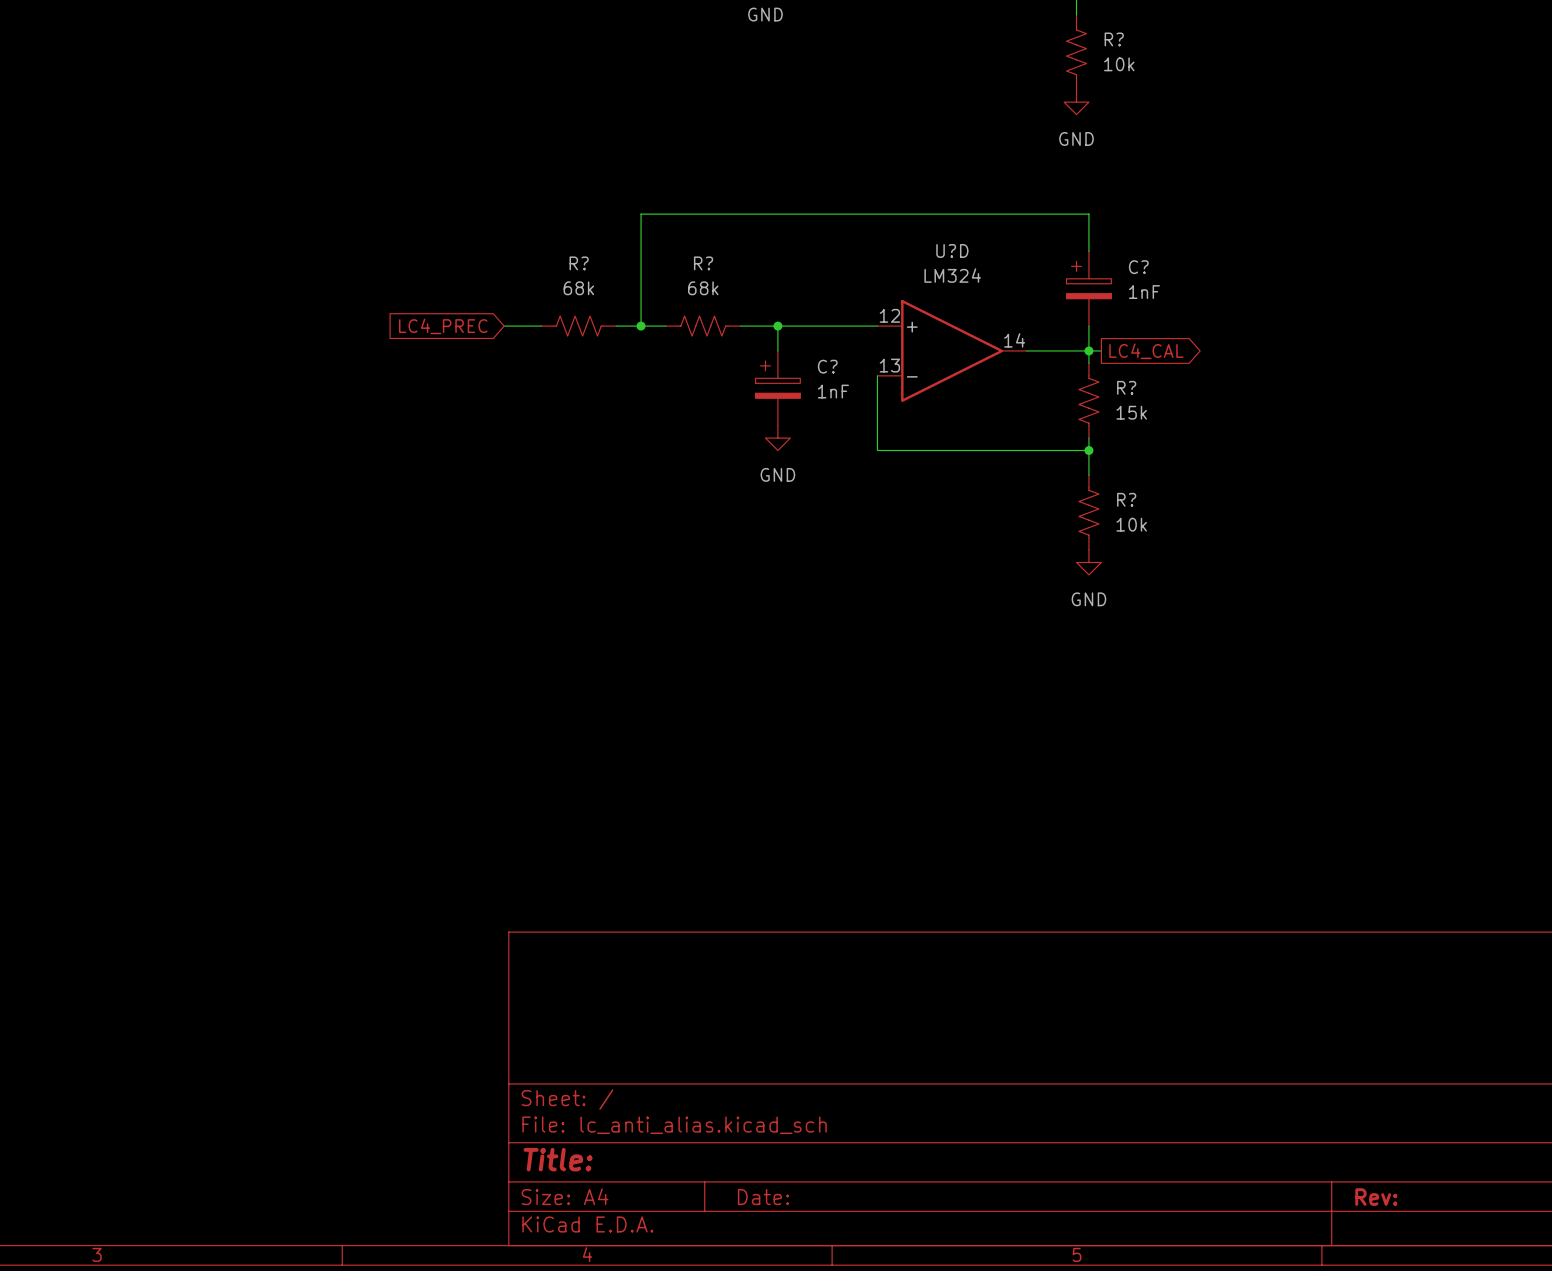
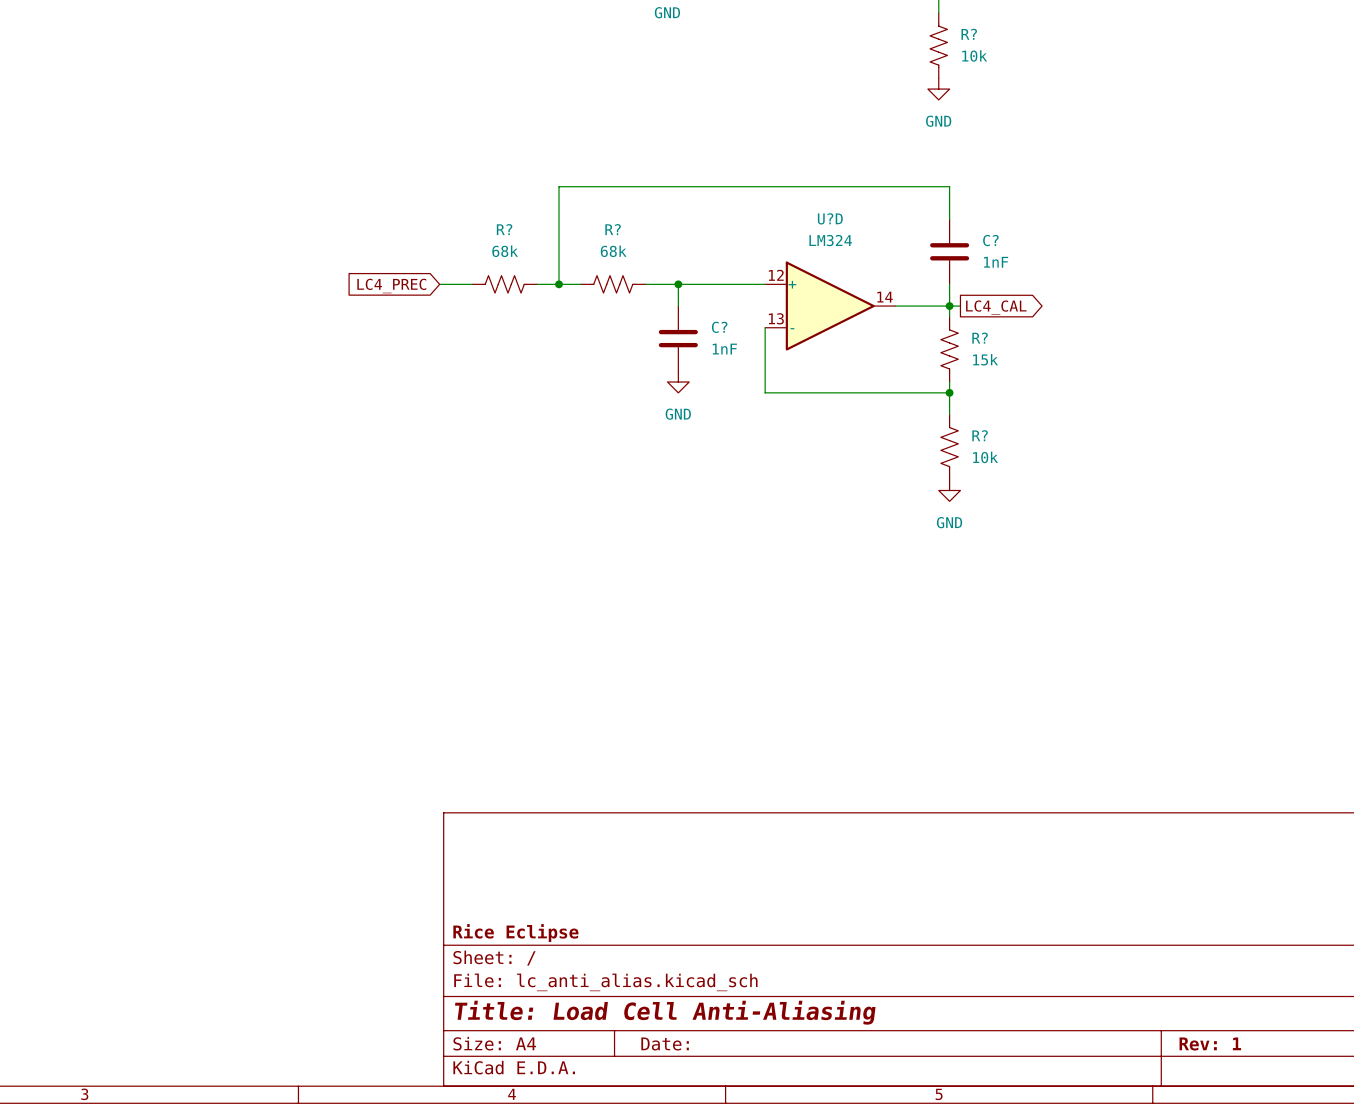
C? symbol: [1066, 251, 1112, 327] -> [930, 219, 970, 285]
C? symbol: [755, 350, 801, 426] -> [658, 306, 698, 372]
title block: none -> Rice Eclipse (515, 933)
title block: Title: (558, 1159) -> Title: Load Cell Anti-Aliasing (665, 1012)
title block: Rev: (1376, 1197) -> Rev: 1 (1210, 1043)

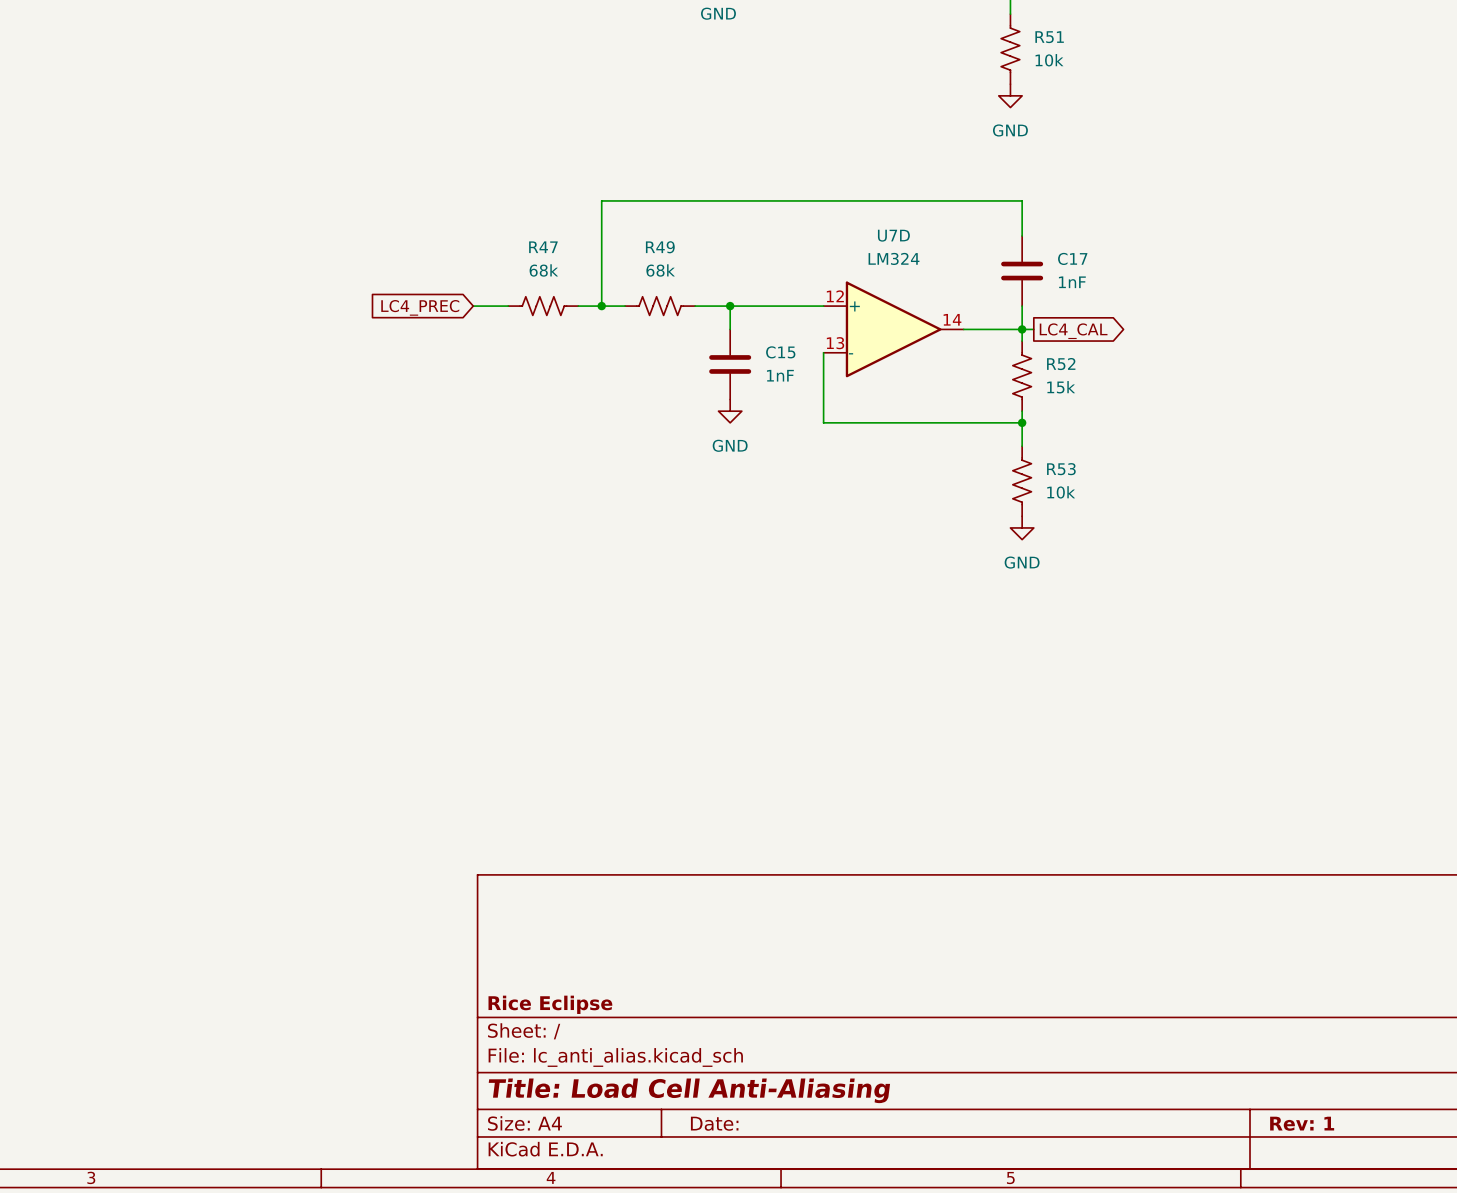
R? name: R? (969, 34) -> R51 (1049, 37)
U?D name: U?D (830, 218) -> U7D (893, 235)
R? name: R? (504, 229) -> R47 (543, 247)
R? name: R? (613, 229) -> R49 (660, 247)
C? name: C? (990, 240) -> C17 (1072, 258)
C? name: C? (719, 327) -> C15 (780, 352)
R? name: R? (980, 338) -> R52 (1061, 364)
R? name: R? (980, 435) -> R53 (1061, 469)

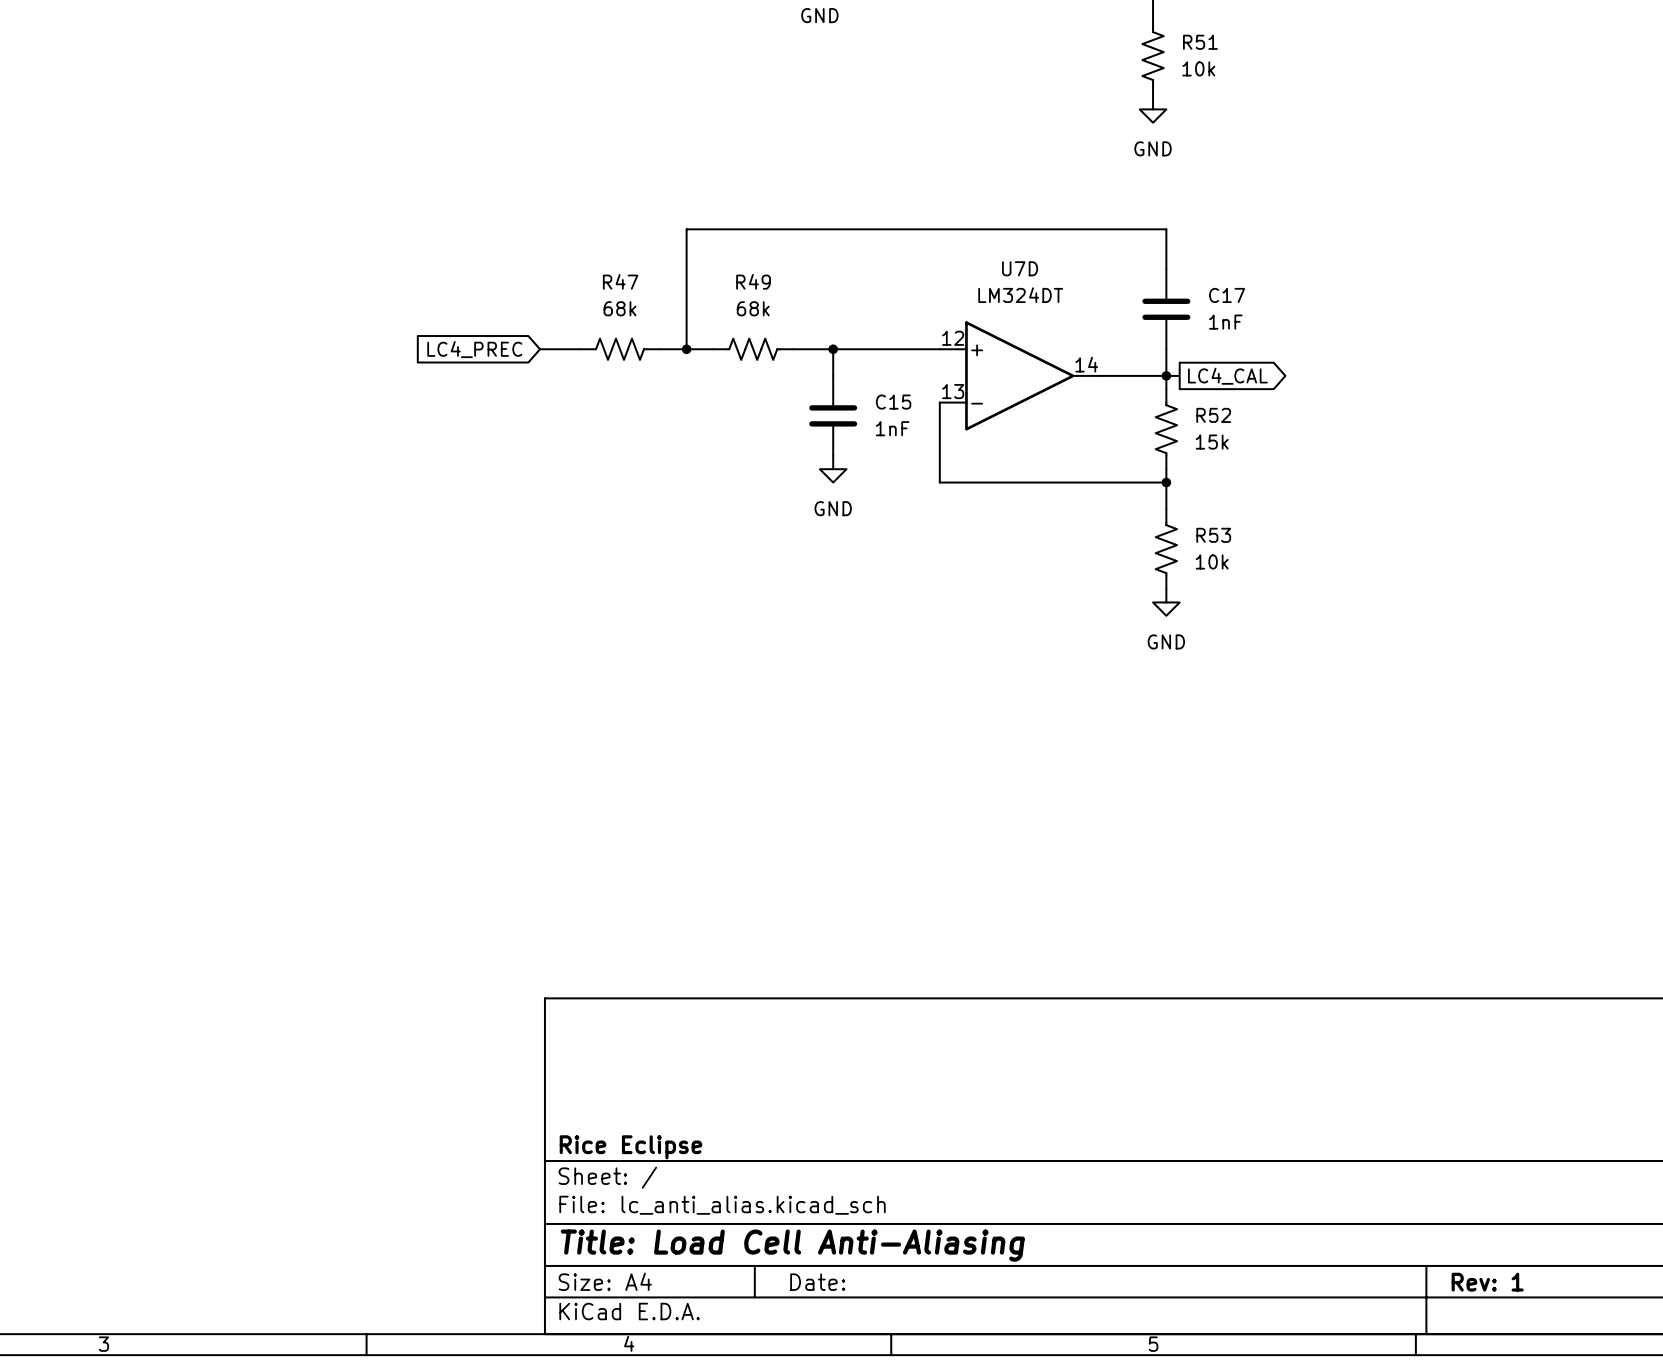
U7D value: LM324 (894, 258) -> LM324DT (1020, 295)

